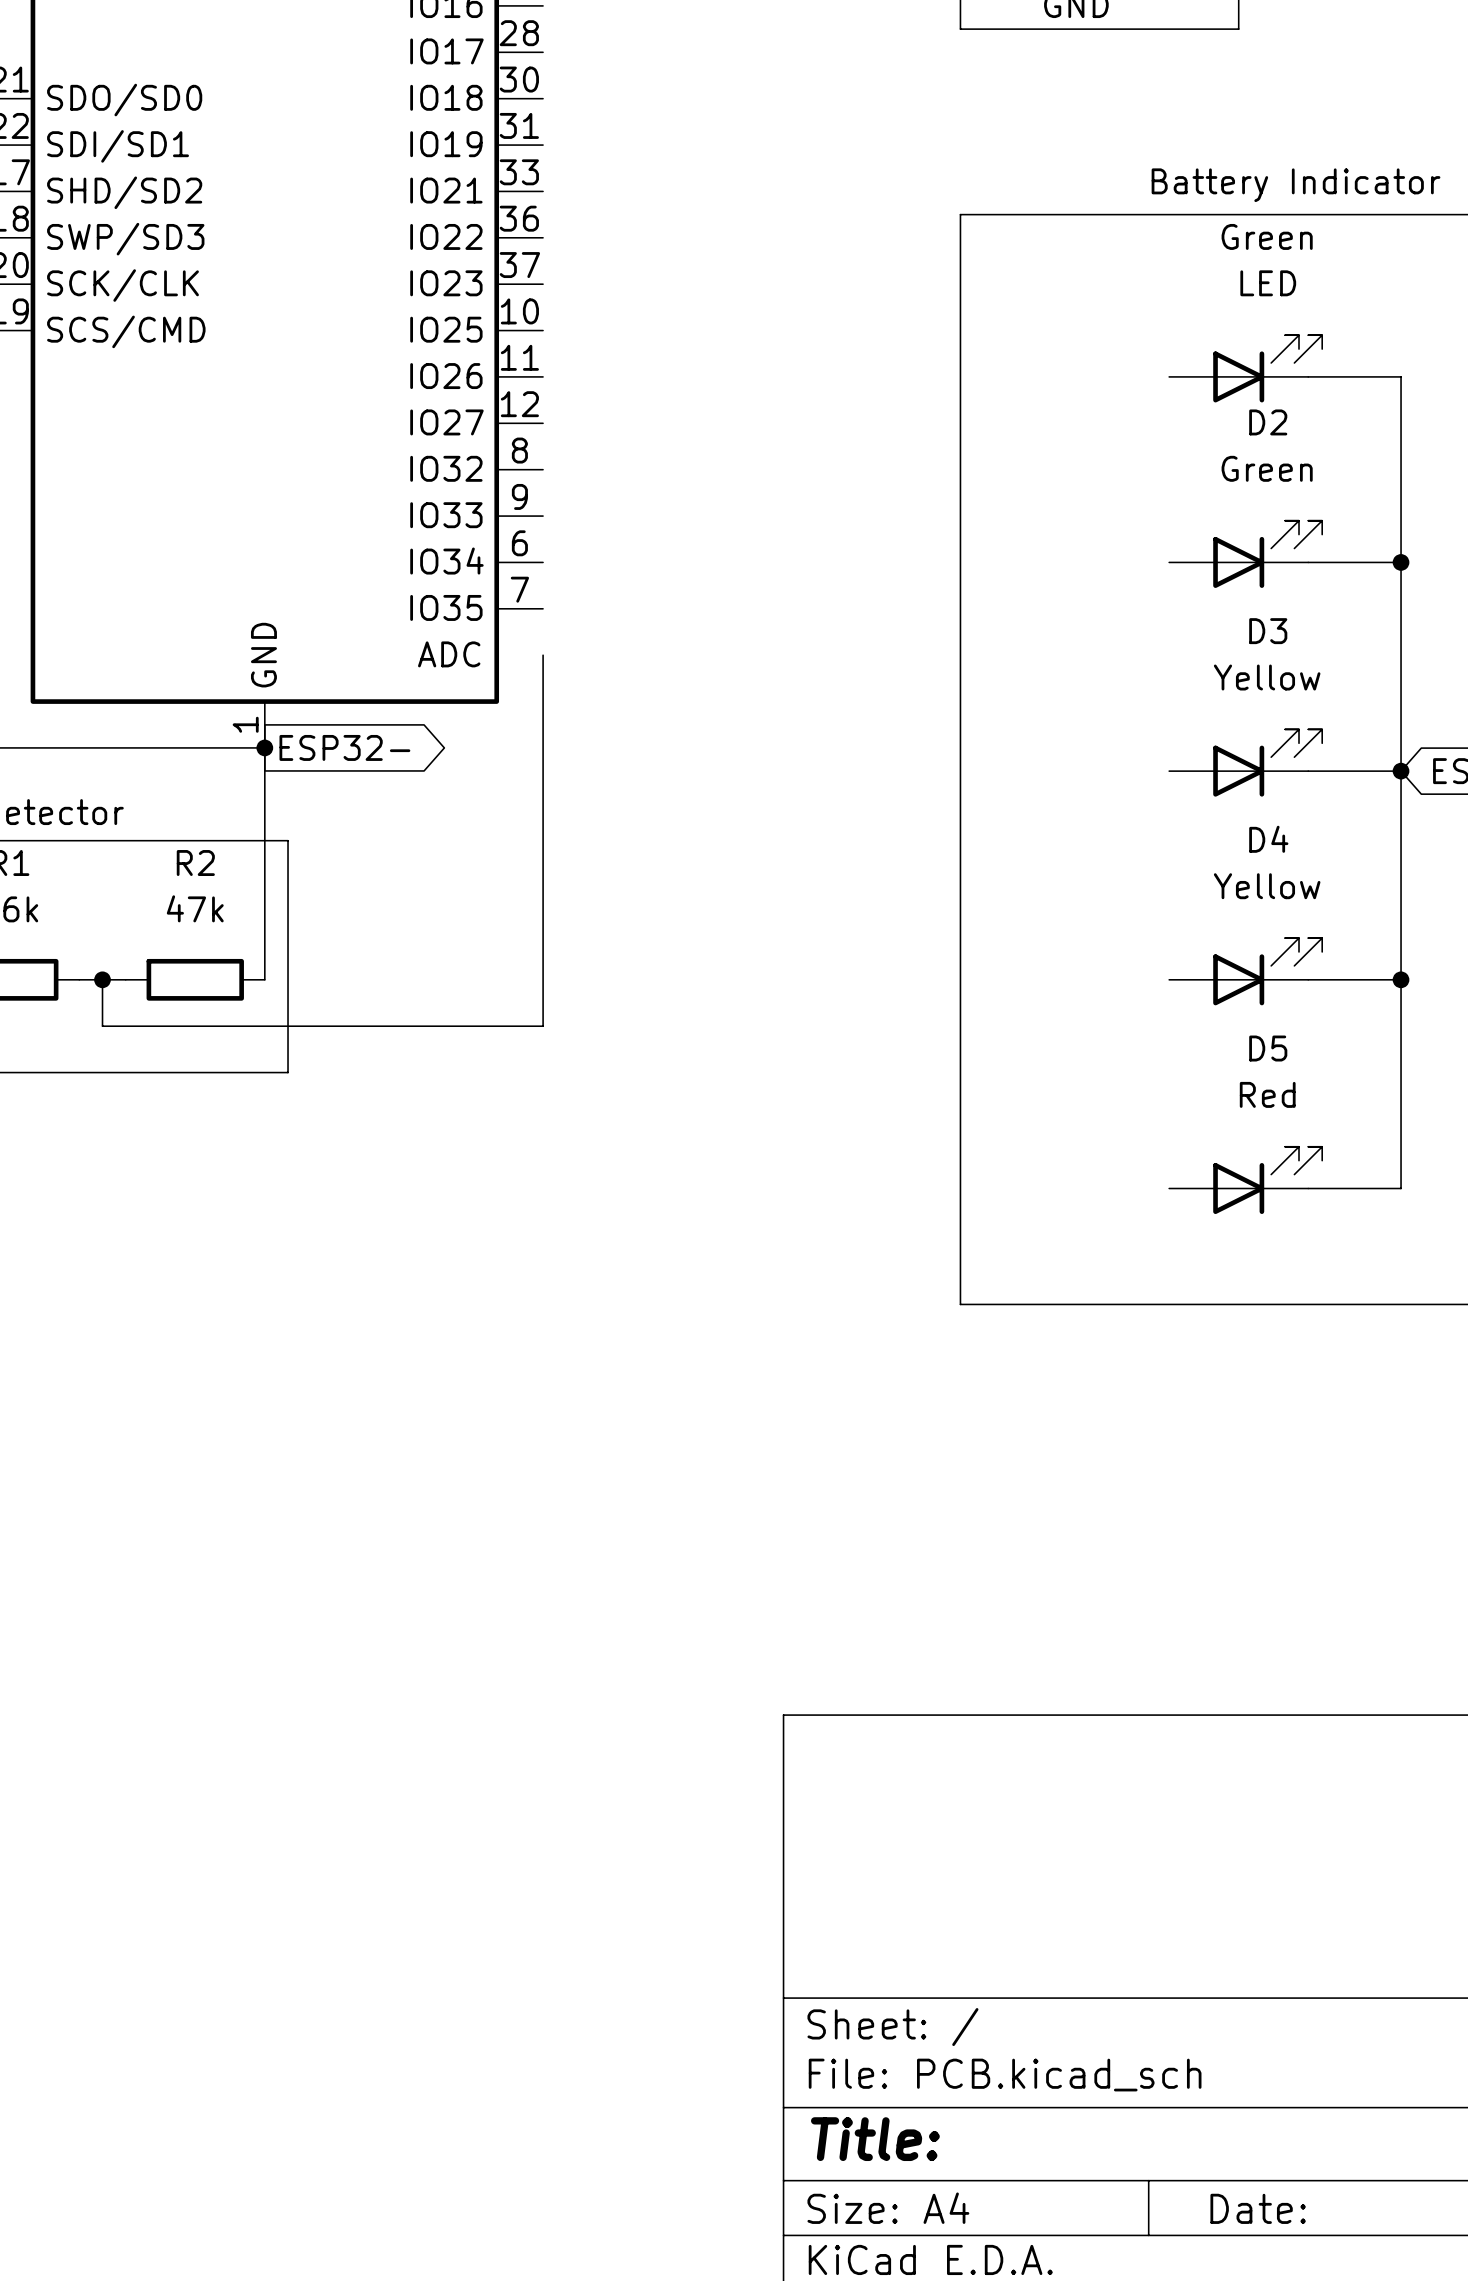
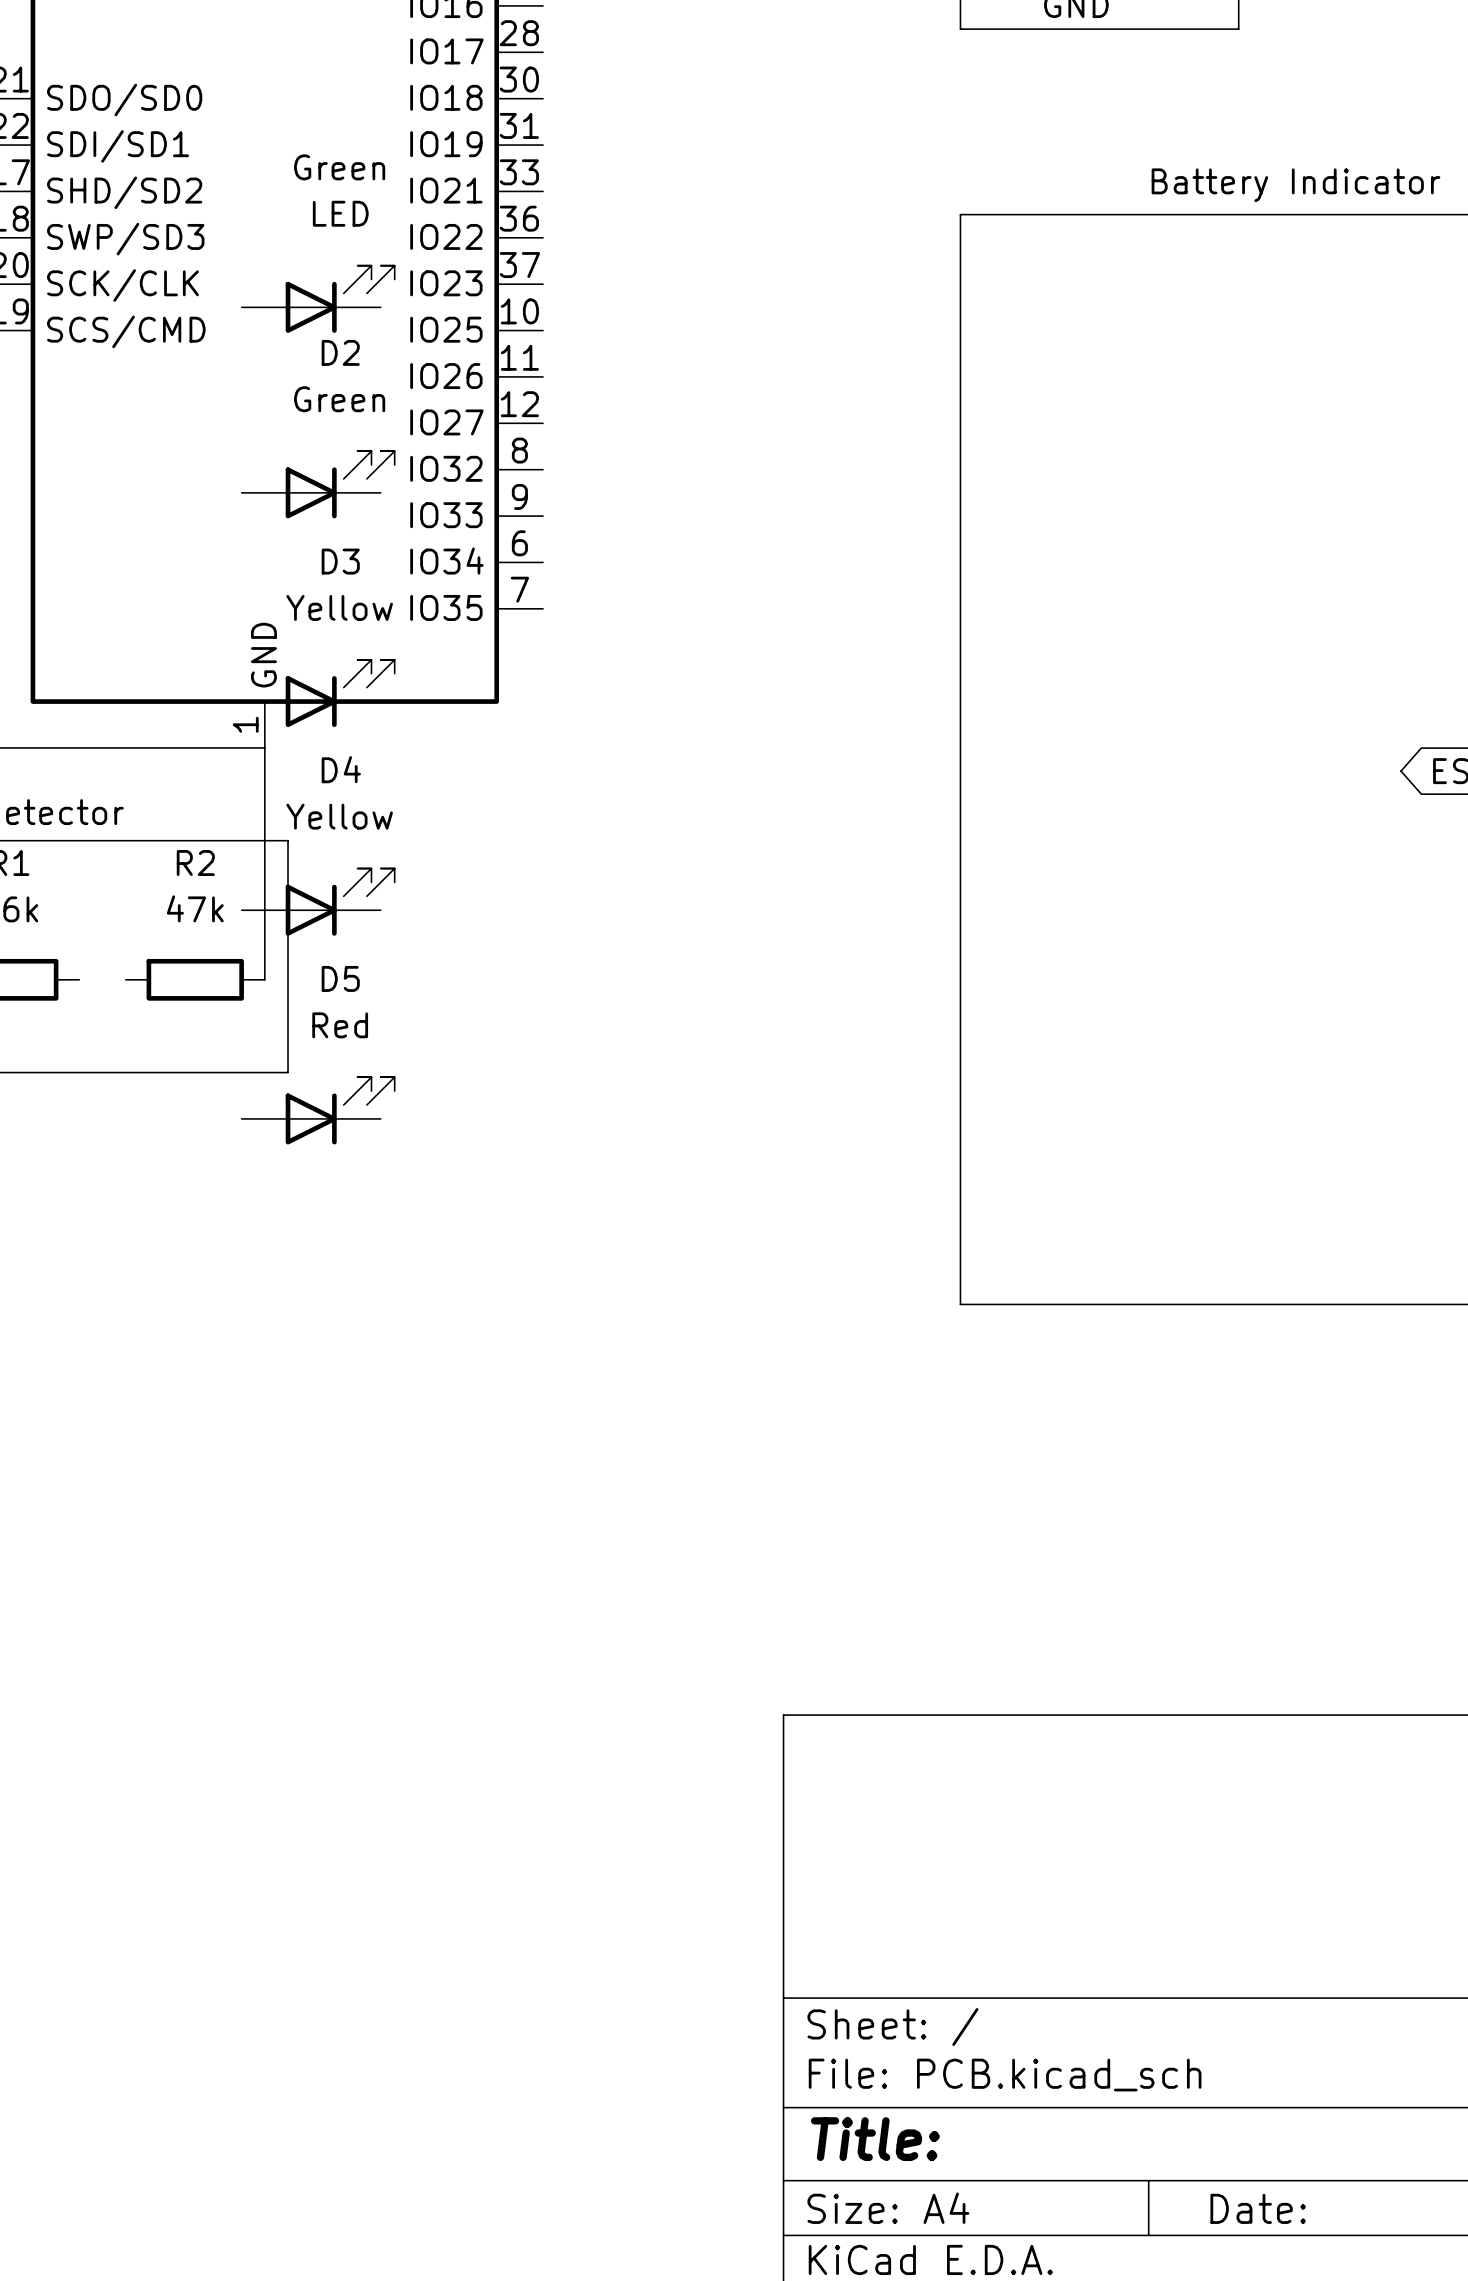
Green: none -> LED (318, 299)
Green: LED (1245, 368) -> none
wire: (1308, 376) (1401, 376) (1401, 1188) (1308, 1188) -> none
D2 position: (1245, 554) -> (318, 484)
wire: (1308, 562) (1401, 562) -> none
junction: (1401, 562) -> none
text: ADC (449, 654) -> none
wire: (543, 655) (543, 1026) (102, 1026) (102, 979) -> none
junction: (264, 747) -> none
global label: ESP32- (344, 747) -> none
D3 position: (1245, 763) -> (318, 693)
wire: (1308, 771) (1401, 771) -> none
junction: (1401, 771) -> none
D4 position: (1245, 971) -> (318, 902)
wire: (79, 979) (125, 979) -> none
junction: (102, 979) -> none
wire: (1308, 979) (1401, 979) -> none
junction: (1401, 979) -> none
D5 position: (1245, 1180) -> (318, 1110)

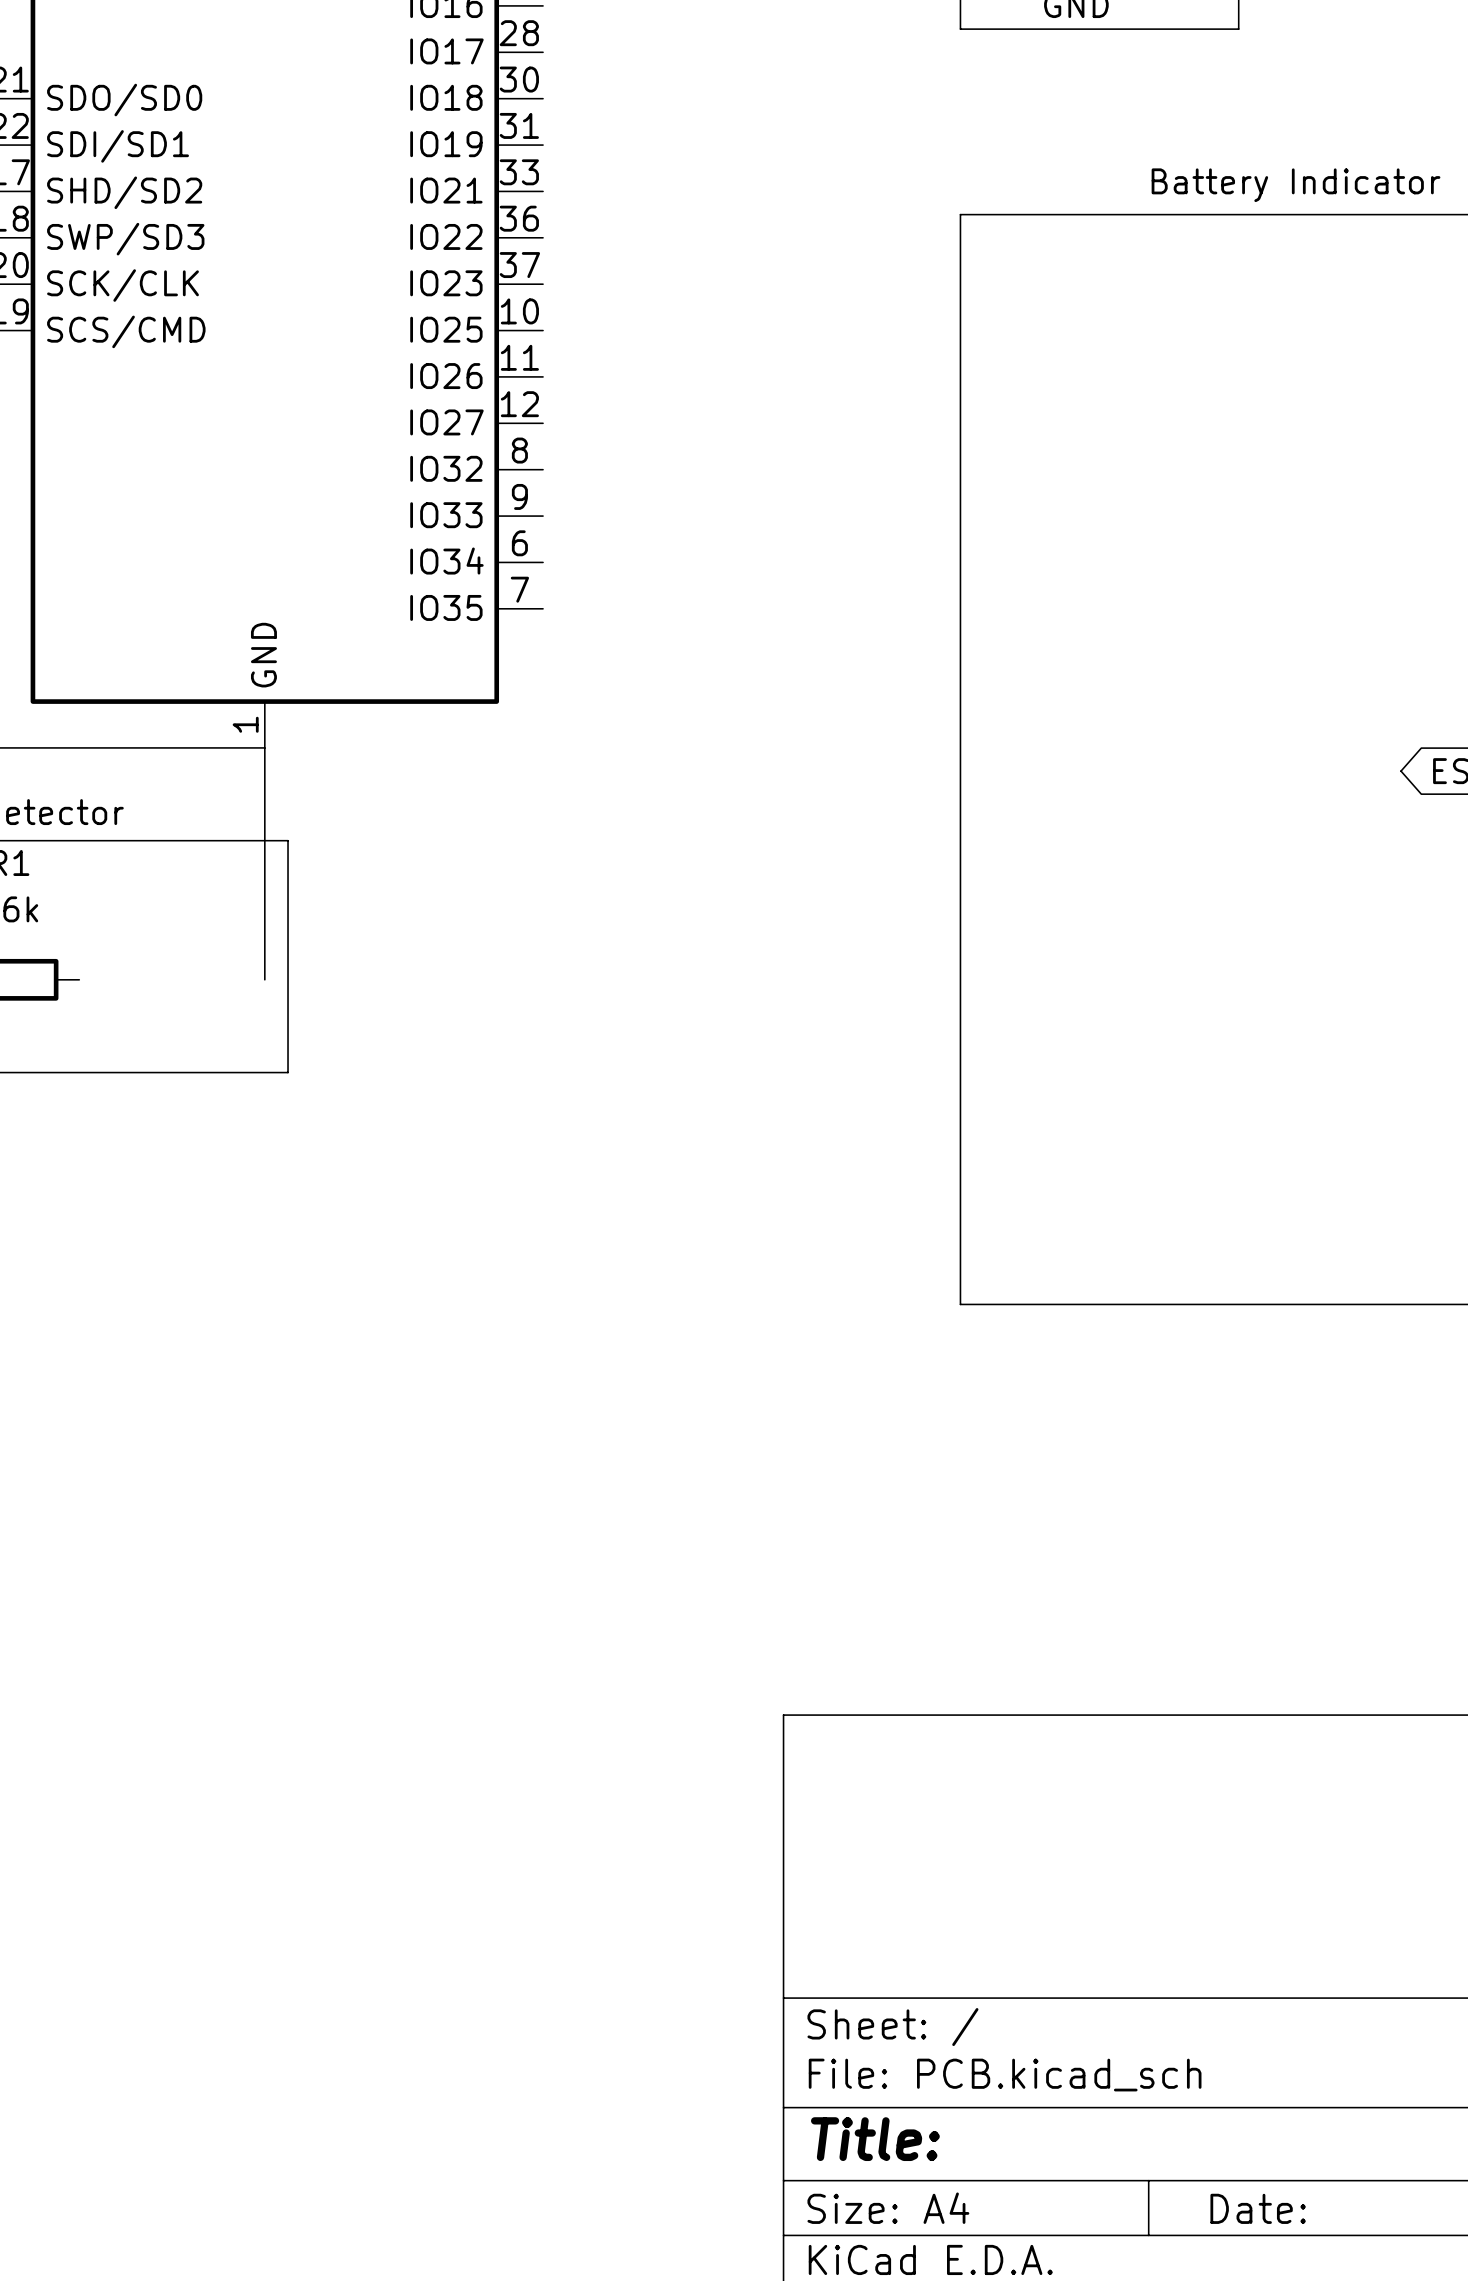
Green: LED (318, 299) -> none
D2: Green (318, 484) -> none
D3: Yellow (318, 693) -> none
D4: Yellow (318, 902) -> none
R2: 47k (195, 979) -> none
D5: Red (318, 1110) -> none

